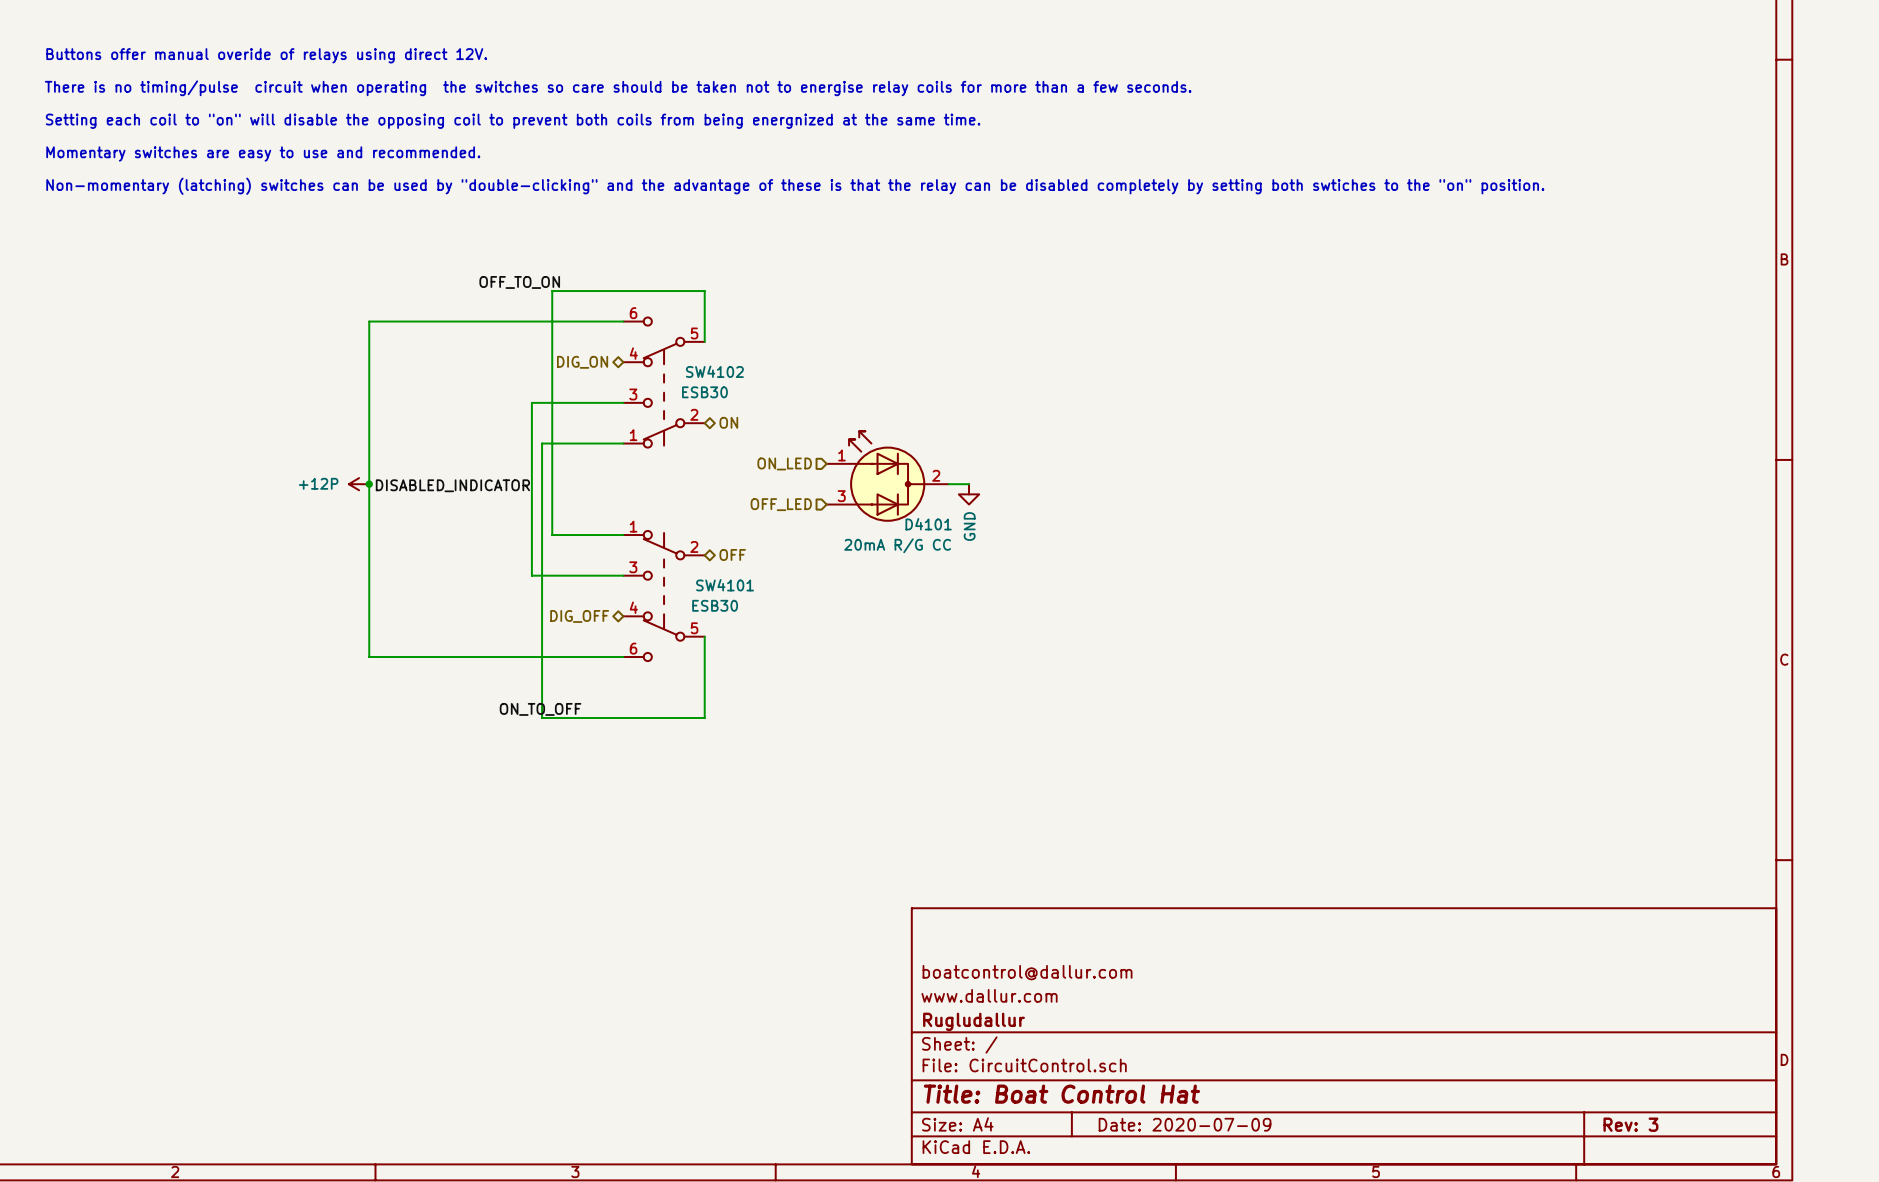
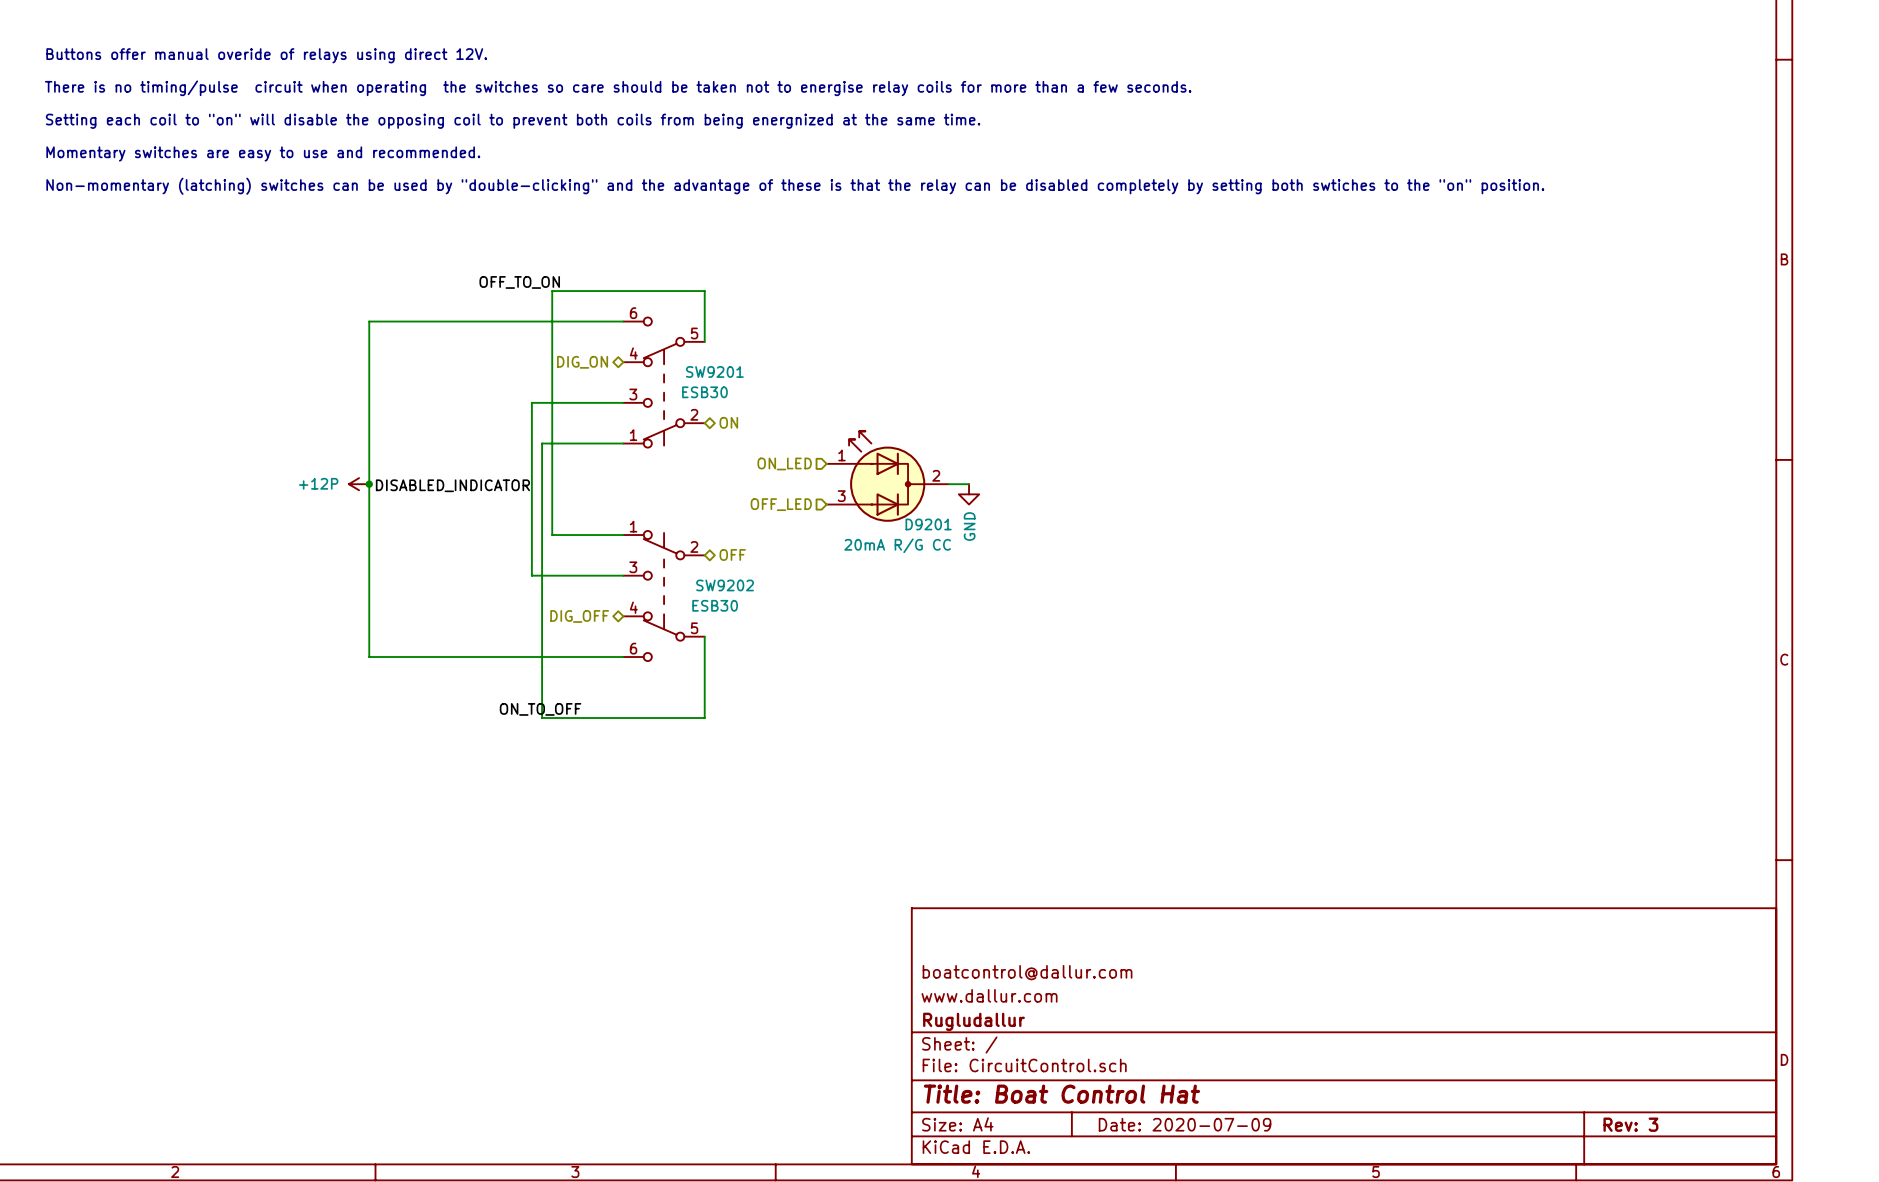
SW4102 name: SW4102 (714, 371) -> SW9201 (714, 371)
D4101 name: D4101 (928, 524) -> D9201 (928, 524)
SW4101 name: SW4101 (725, 585) -> SW9202 (725, 585)

